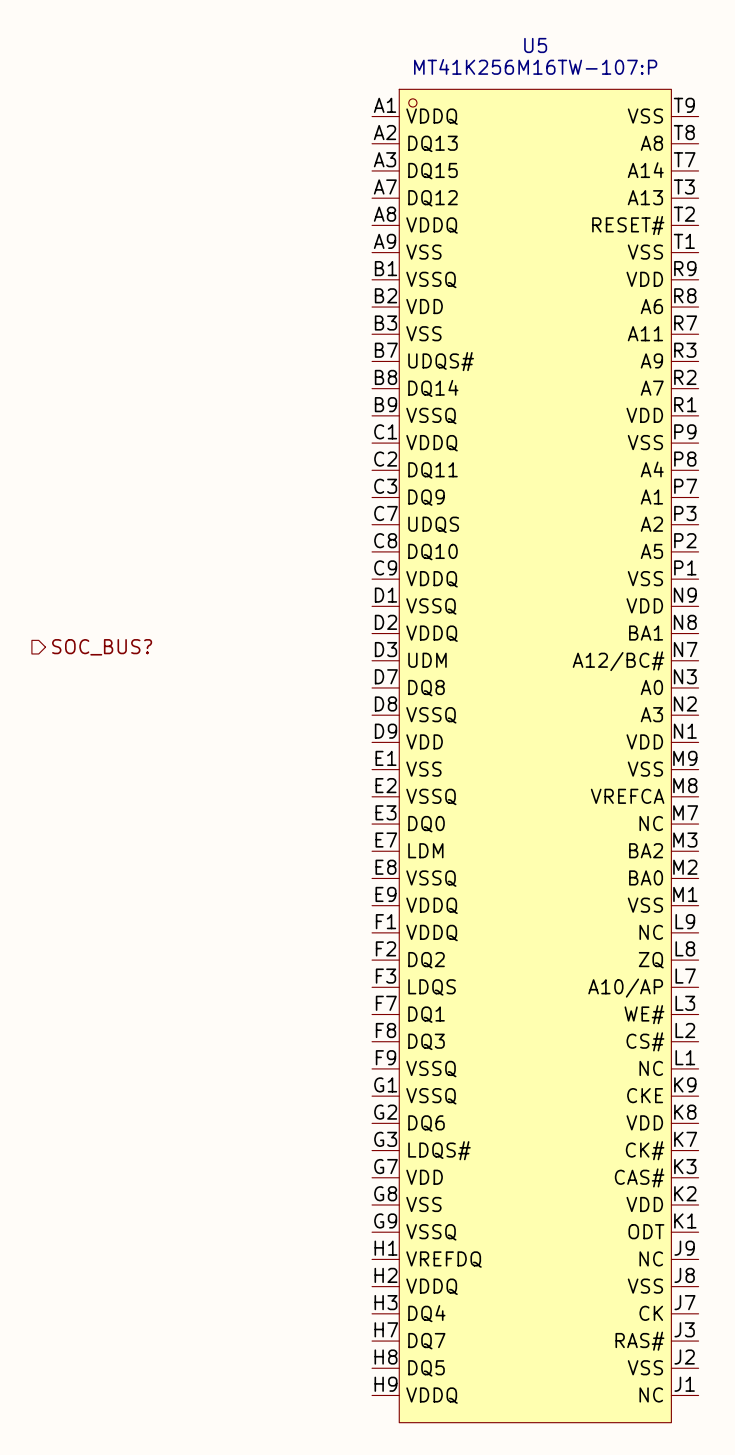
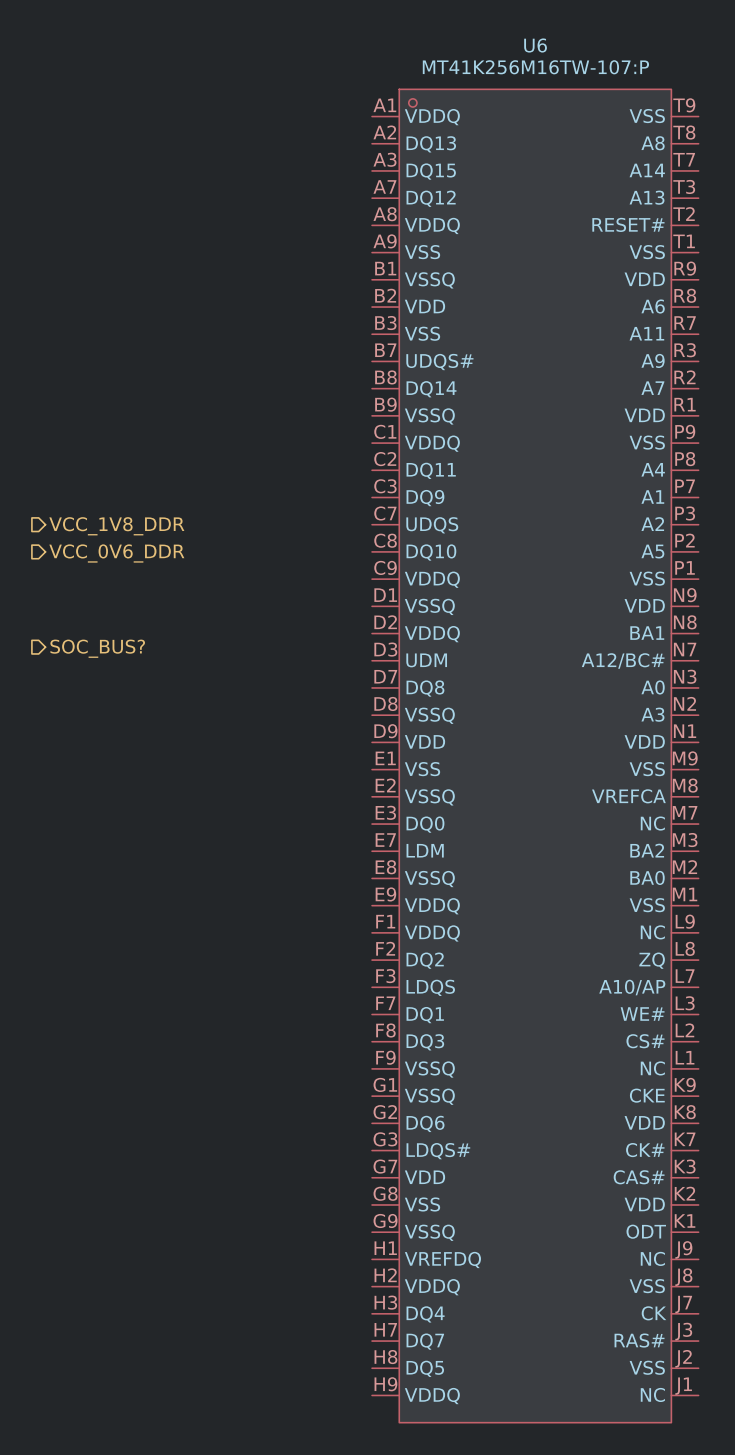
U5 name: U5 (535, 45) -> U6 (535, 45)
hierarchical label: none -> VCC_1V8_DDR (116, 526)
hierarchical label: none -> VCC_0V6_DDR (116, 553)

